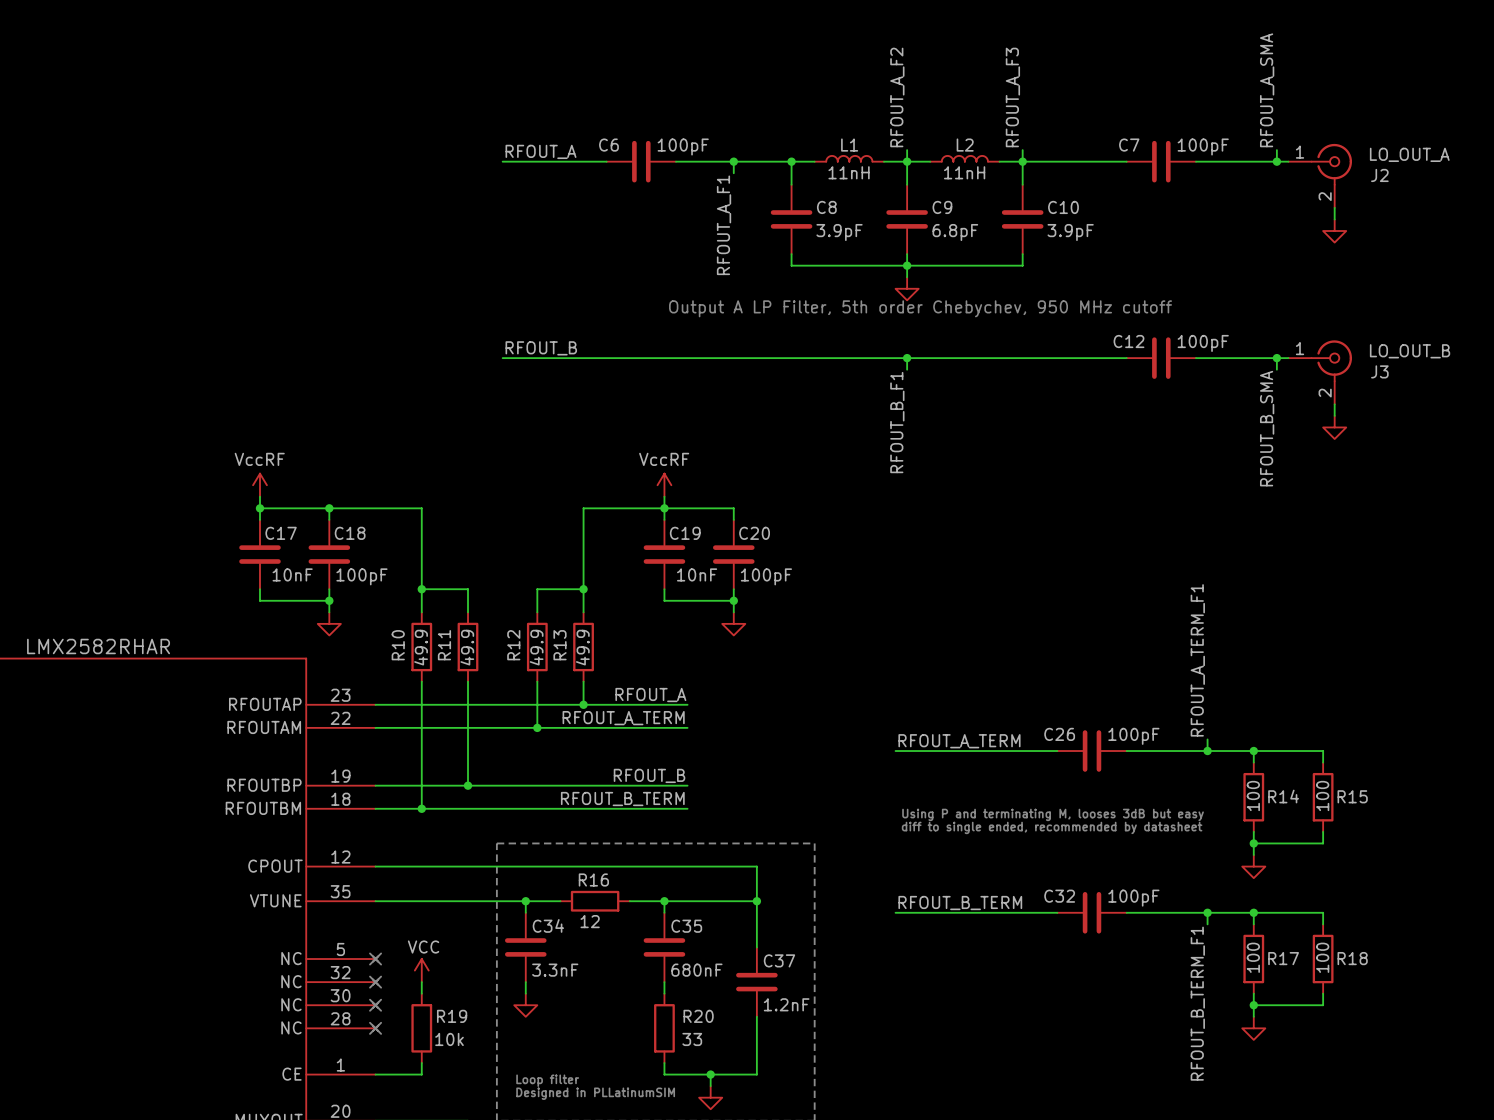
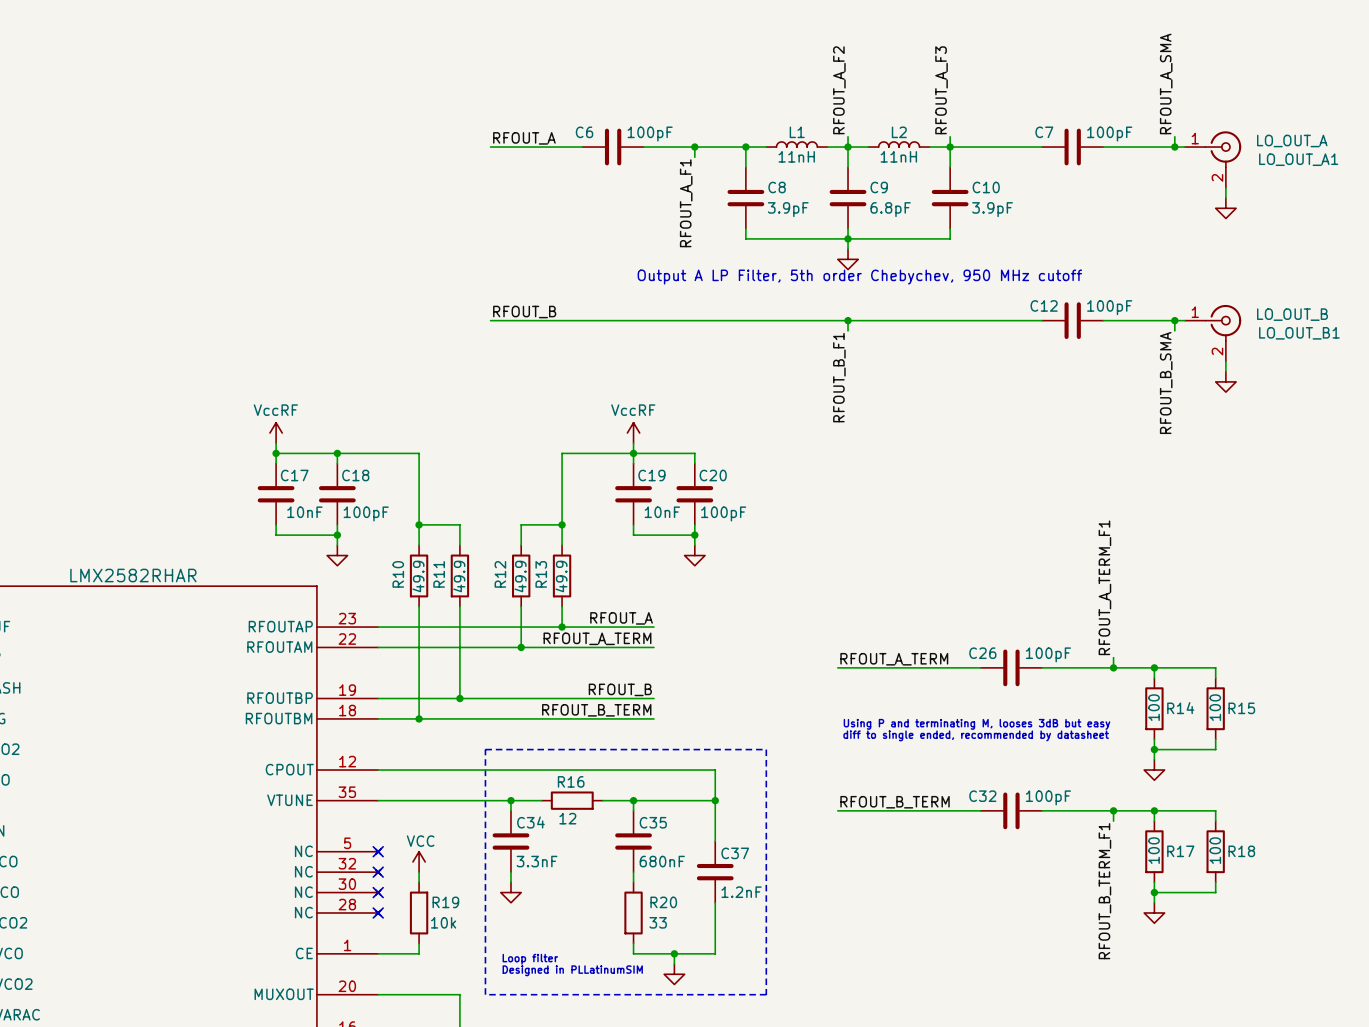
J2 name: J2 (1379, 175) -> LO_OUT_A1 (1298, 159)
J3 name: J3 (1379, 371) -> LO_OUT_B1 (1299, 333)

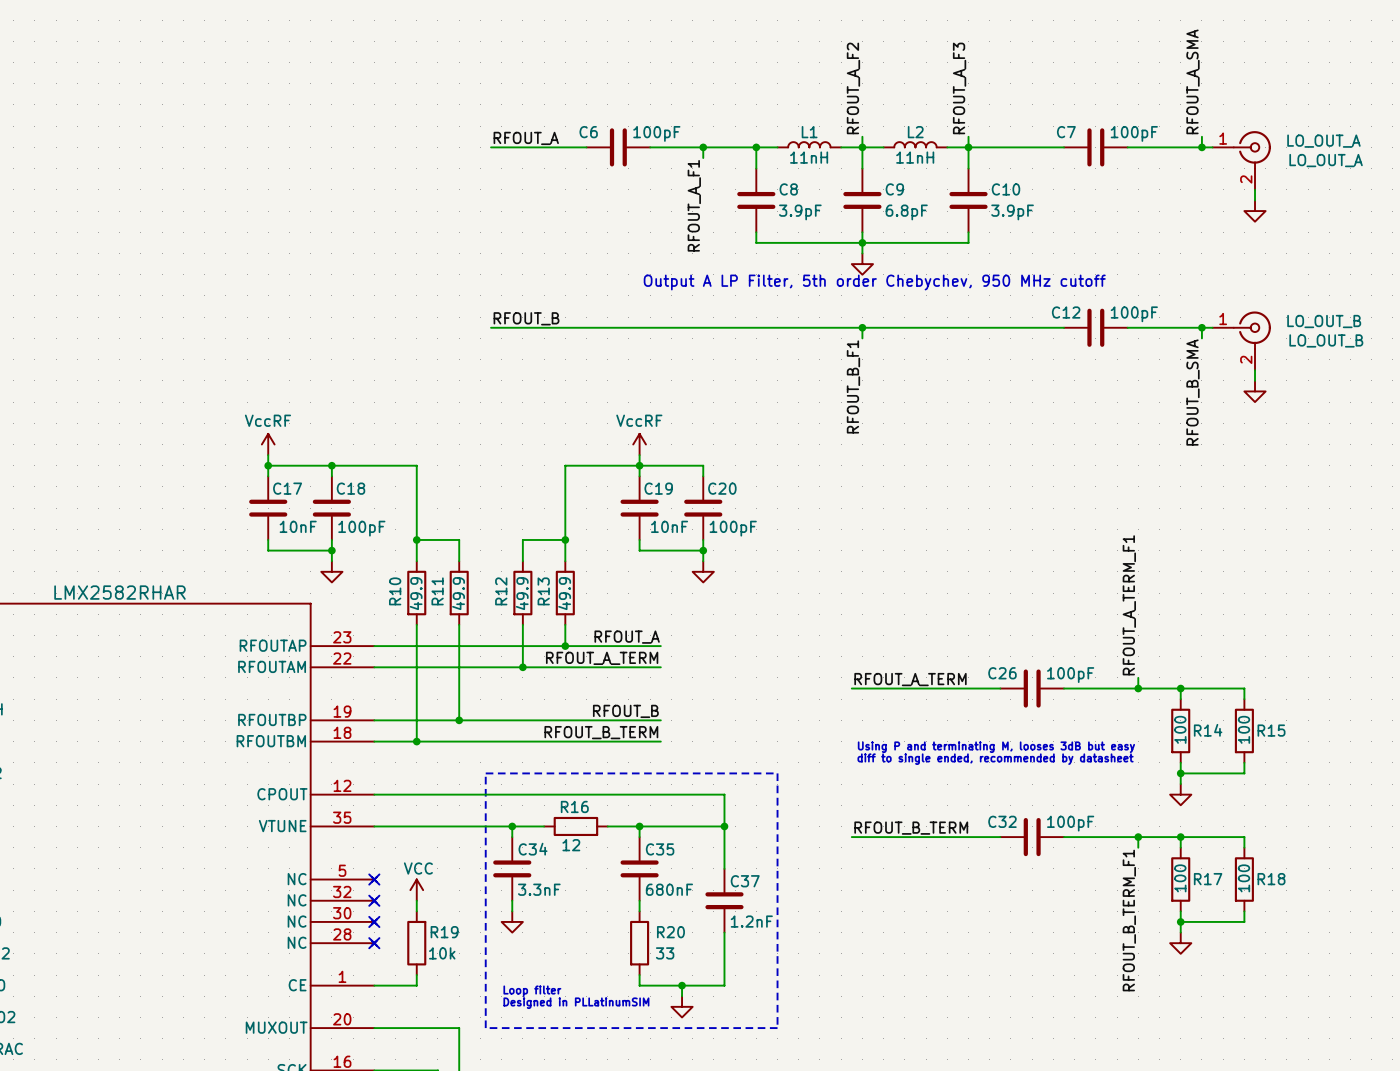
LO_OUT_A1 name: LO_OUT_A1 (1298, 159) -> LO_OUT_A (1326, 160)
LO_OUT_B1 name: LO_OUT_B1 (1299, 333) -> LO_OUT_B (1326, 340)

